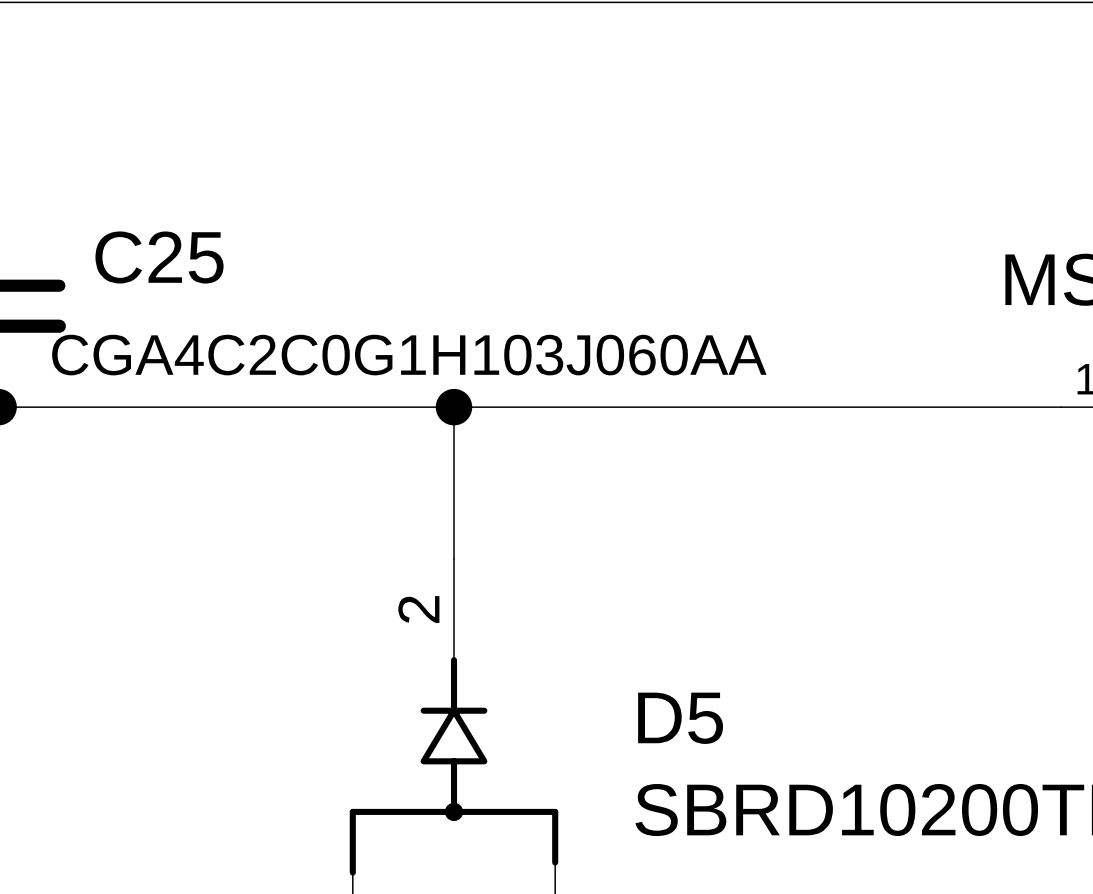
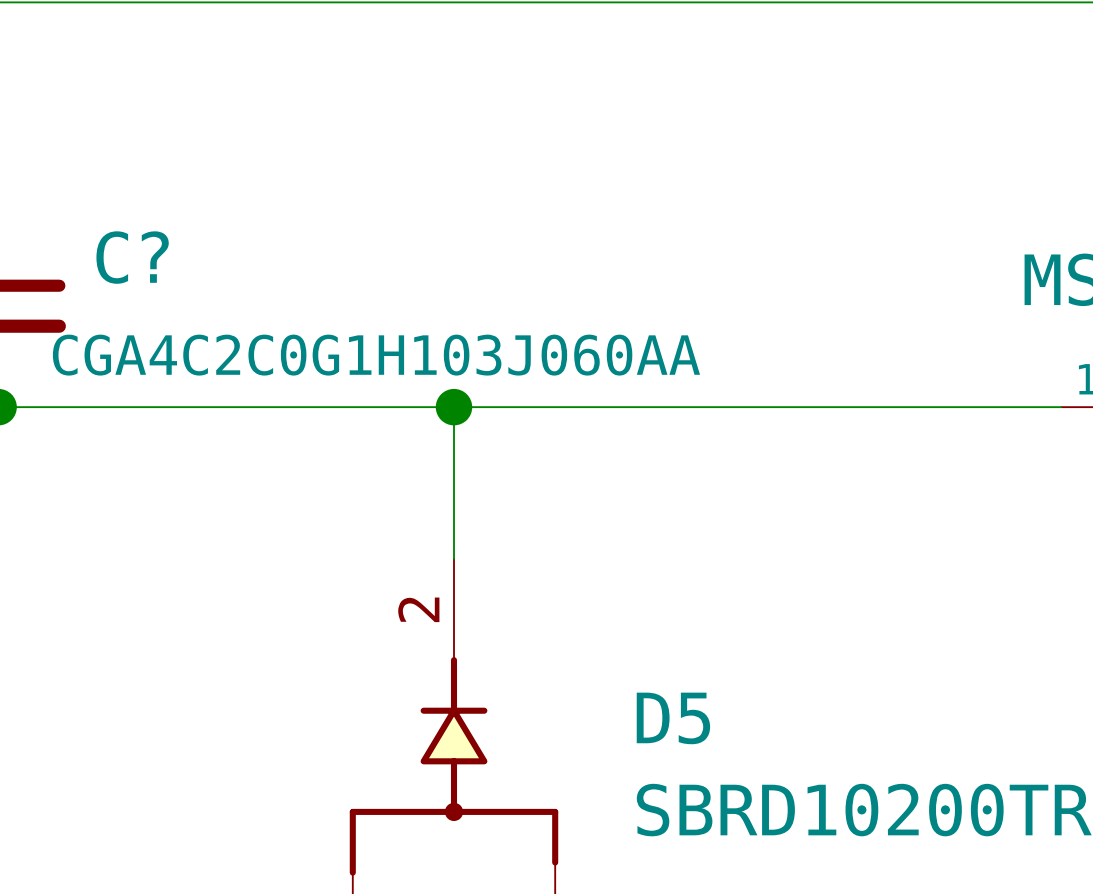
C25 name: C25 (159, 257) -> C? (132, 257)

